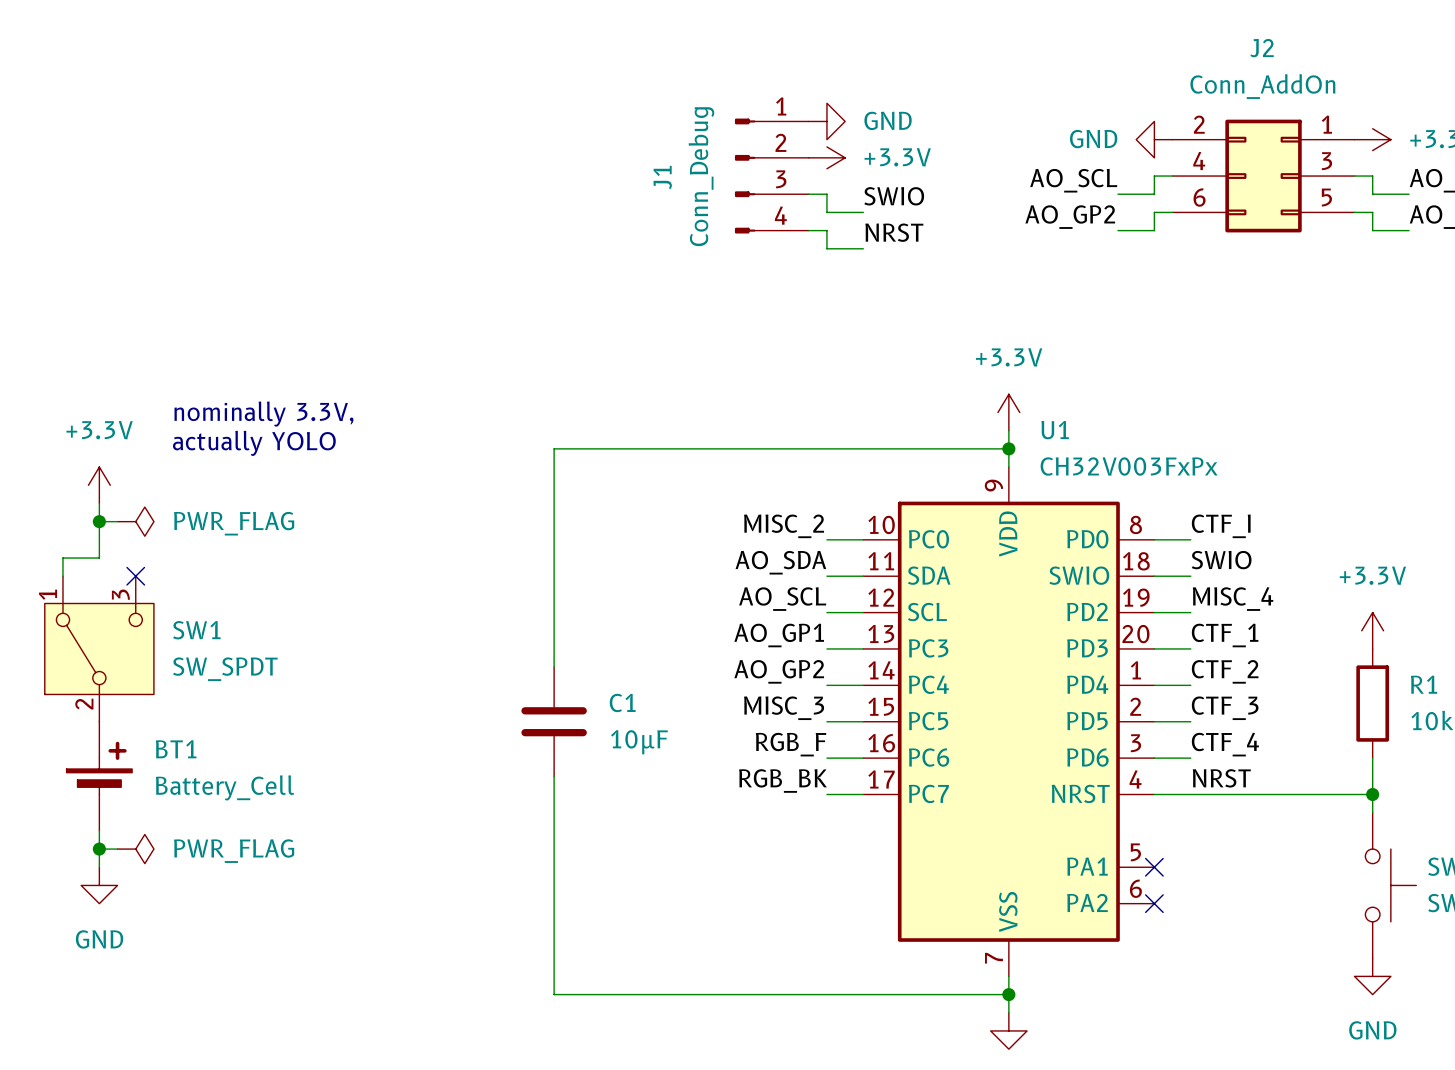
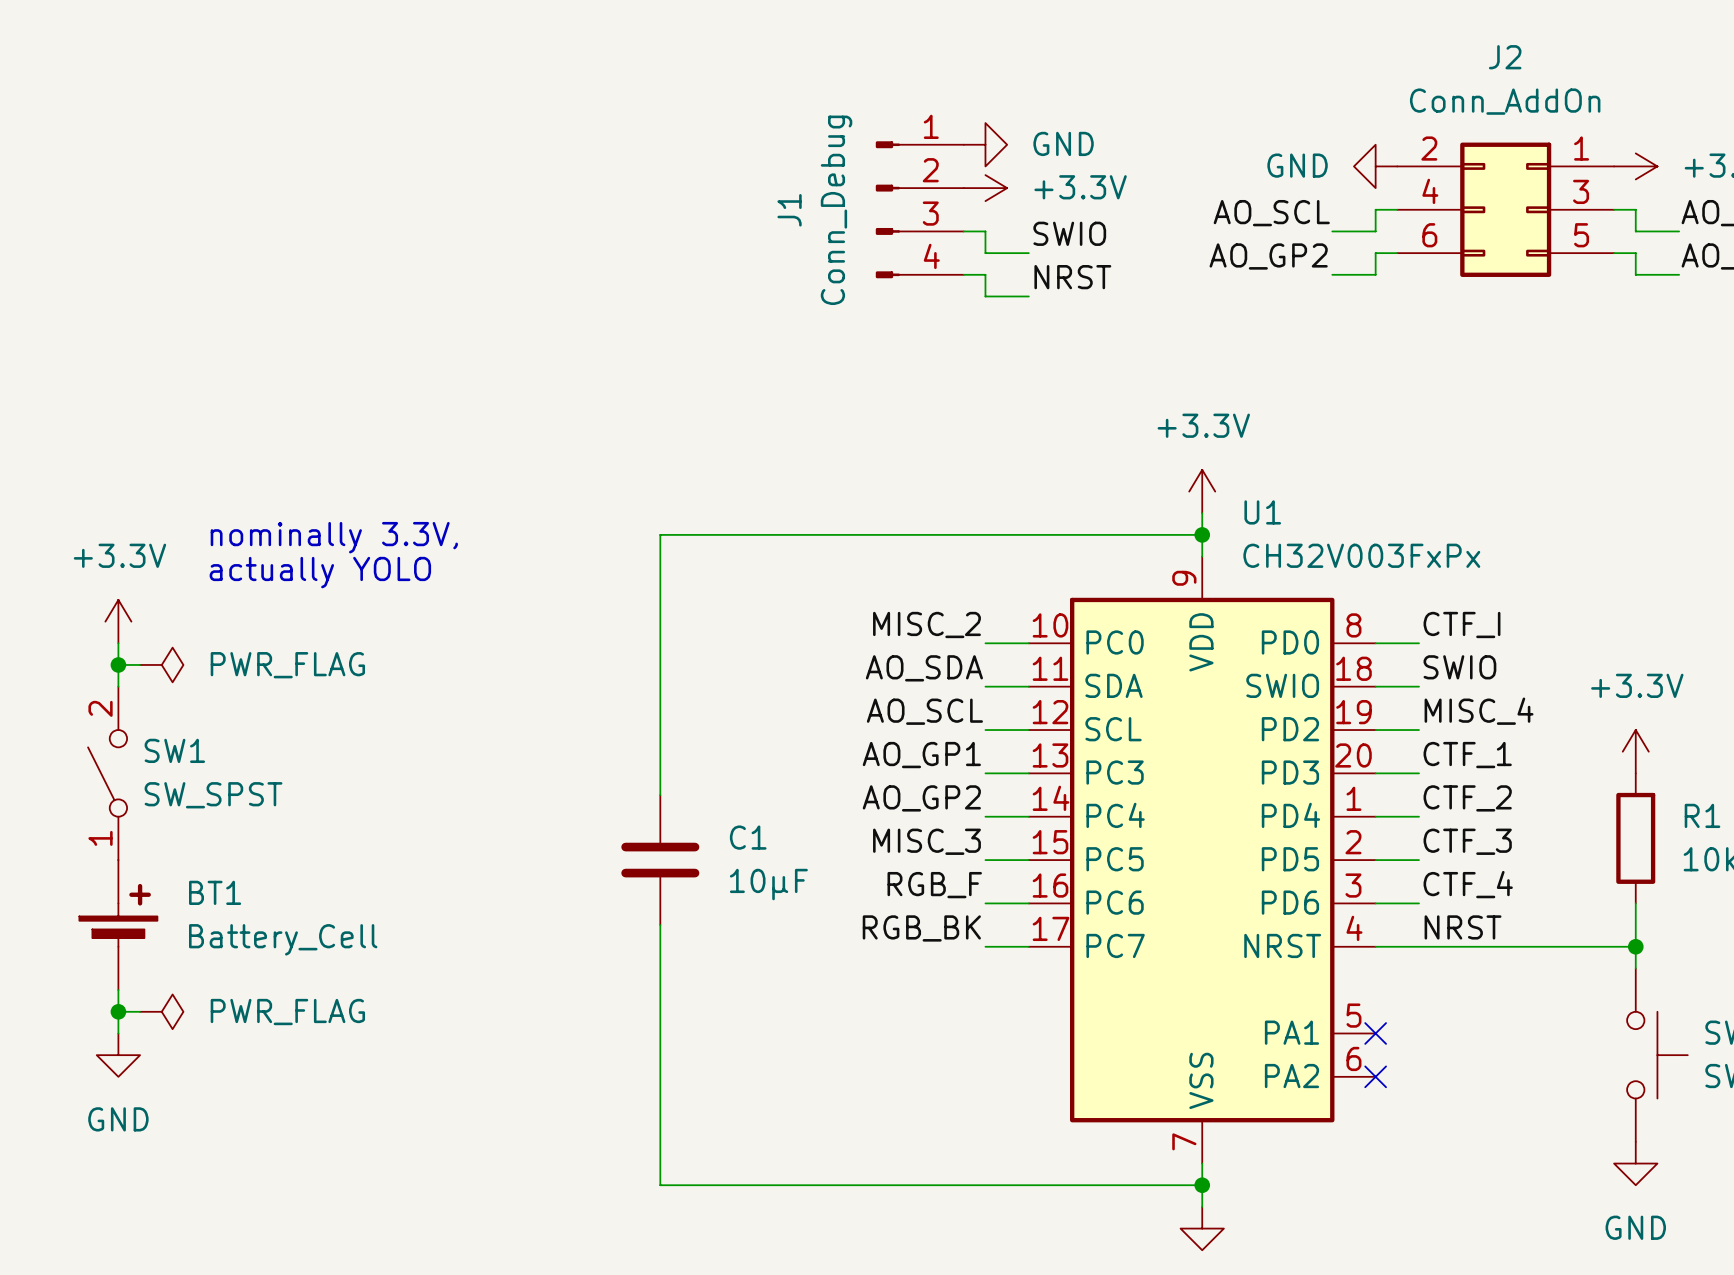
text position: nominally 3.3V, (263, 414) -> nominally 3.3V, (334, 537)
text position: actually YOLO (254, 443) -> actually YOLO (320, 572)
power symbol position: +3.3V (99, 485) -> +3.3V (118, 621)
wire: (99, 521) (117, 521) -> none
junction position: (99, 521) -> (118, 664)
power symbol position: PWR_FLAG (135, 521) -> PWR_FLAG (161, 664)
wire: (99, 558) (62, 558) (62, 576) -> none
wire: none -> (140, 664) (118, 664) (118, 686)
SW1 symbol: [44, 576, 154, 722] -> [88, 686, 128, 861]
no-connect mark: (135, 576) -> none
SW1 name position: SW1 (196, 630) -> SW1 (174, 750)
SW1 value: SW_SPDT (225, 669) -> SW_SPST (213, 795)

